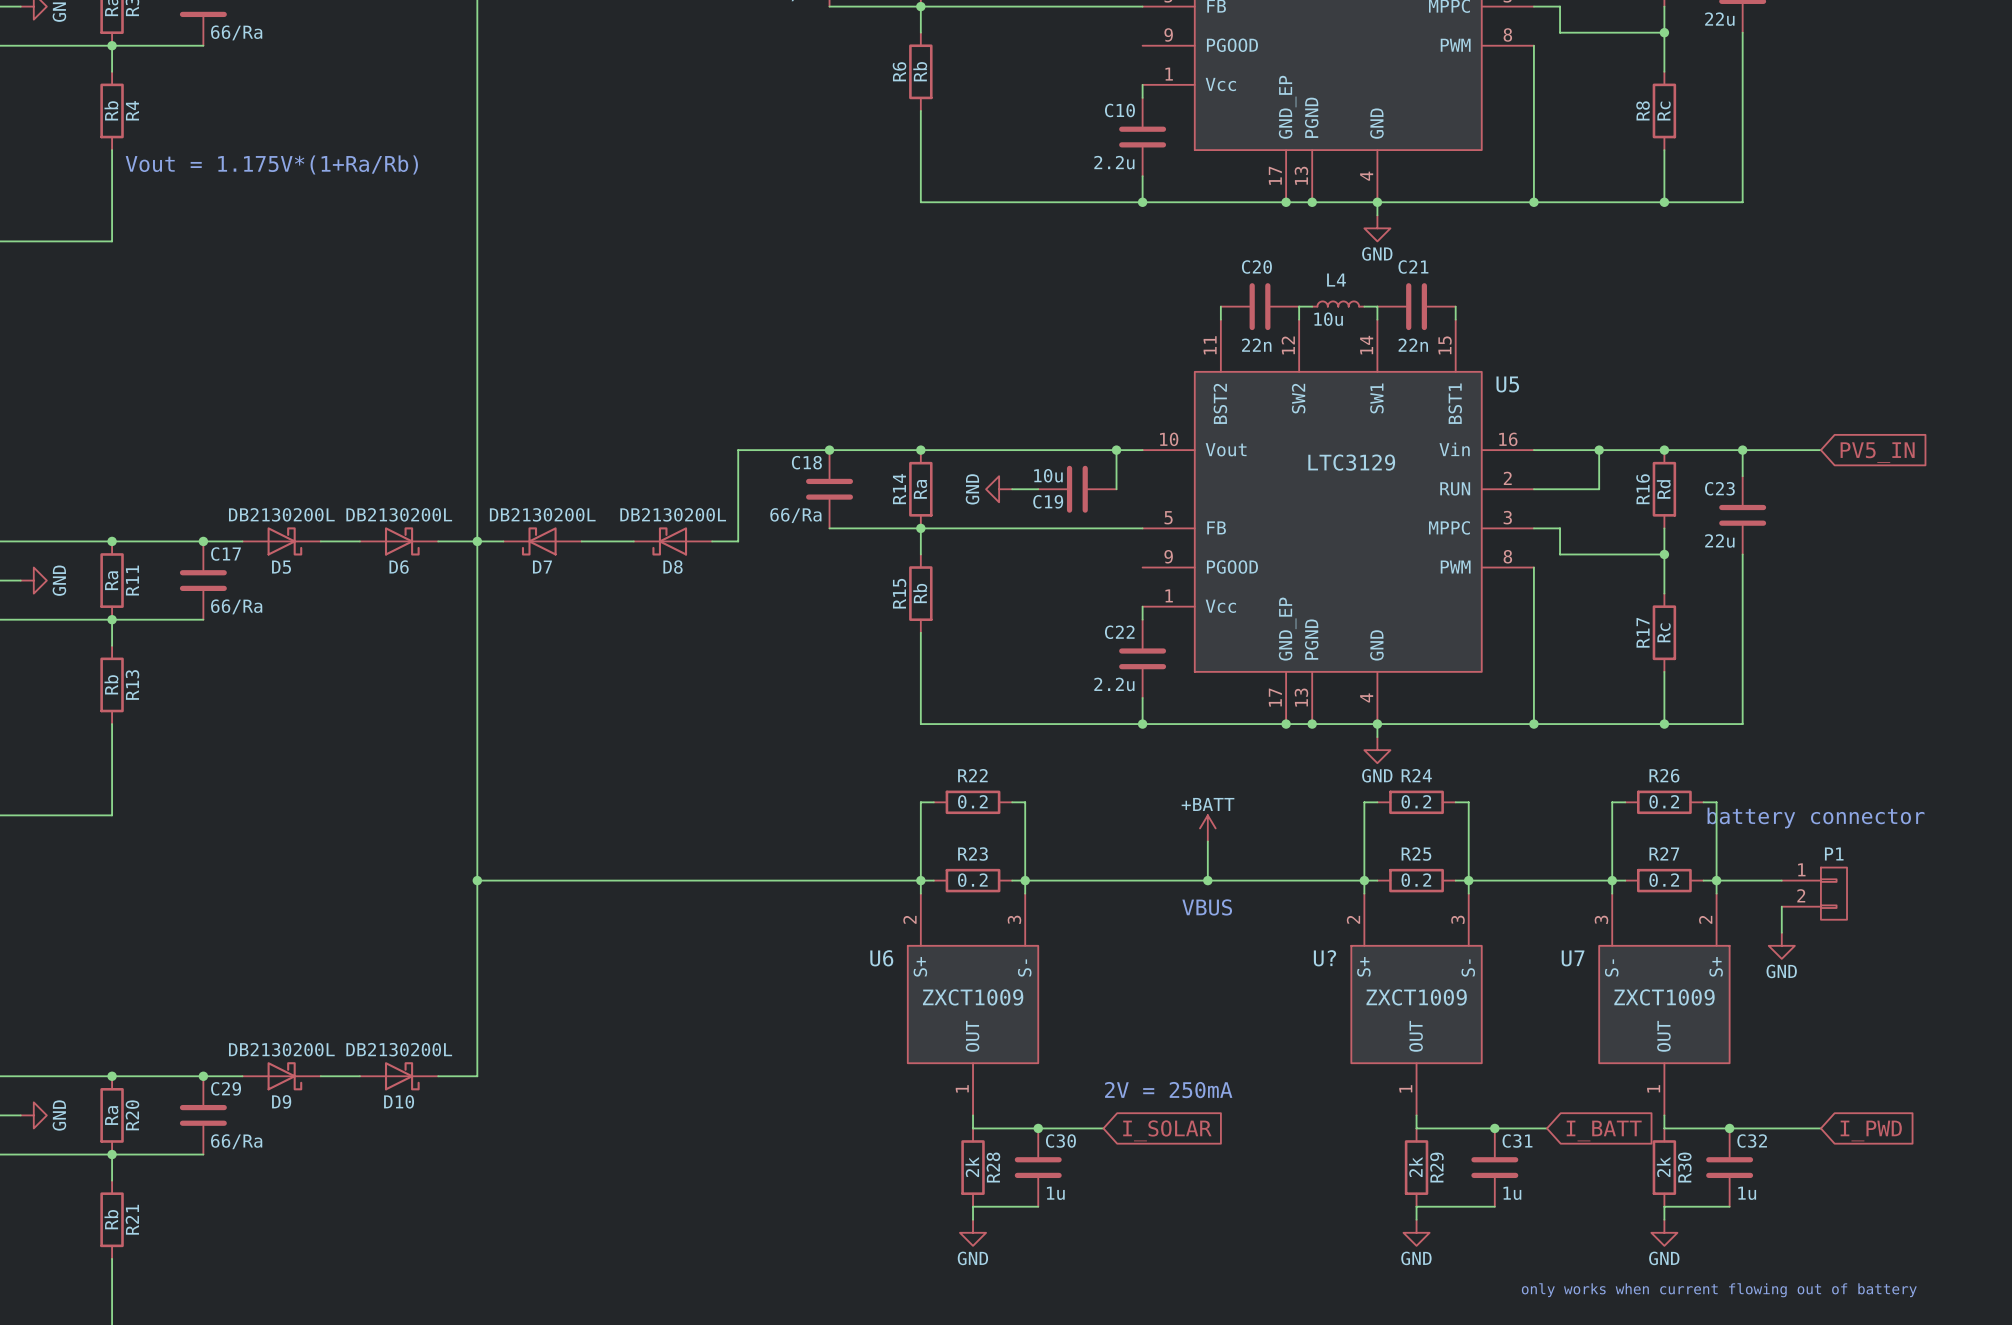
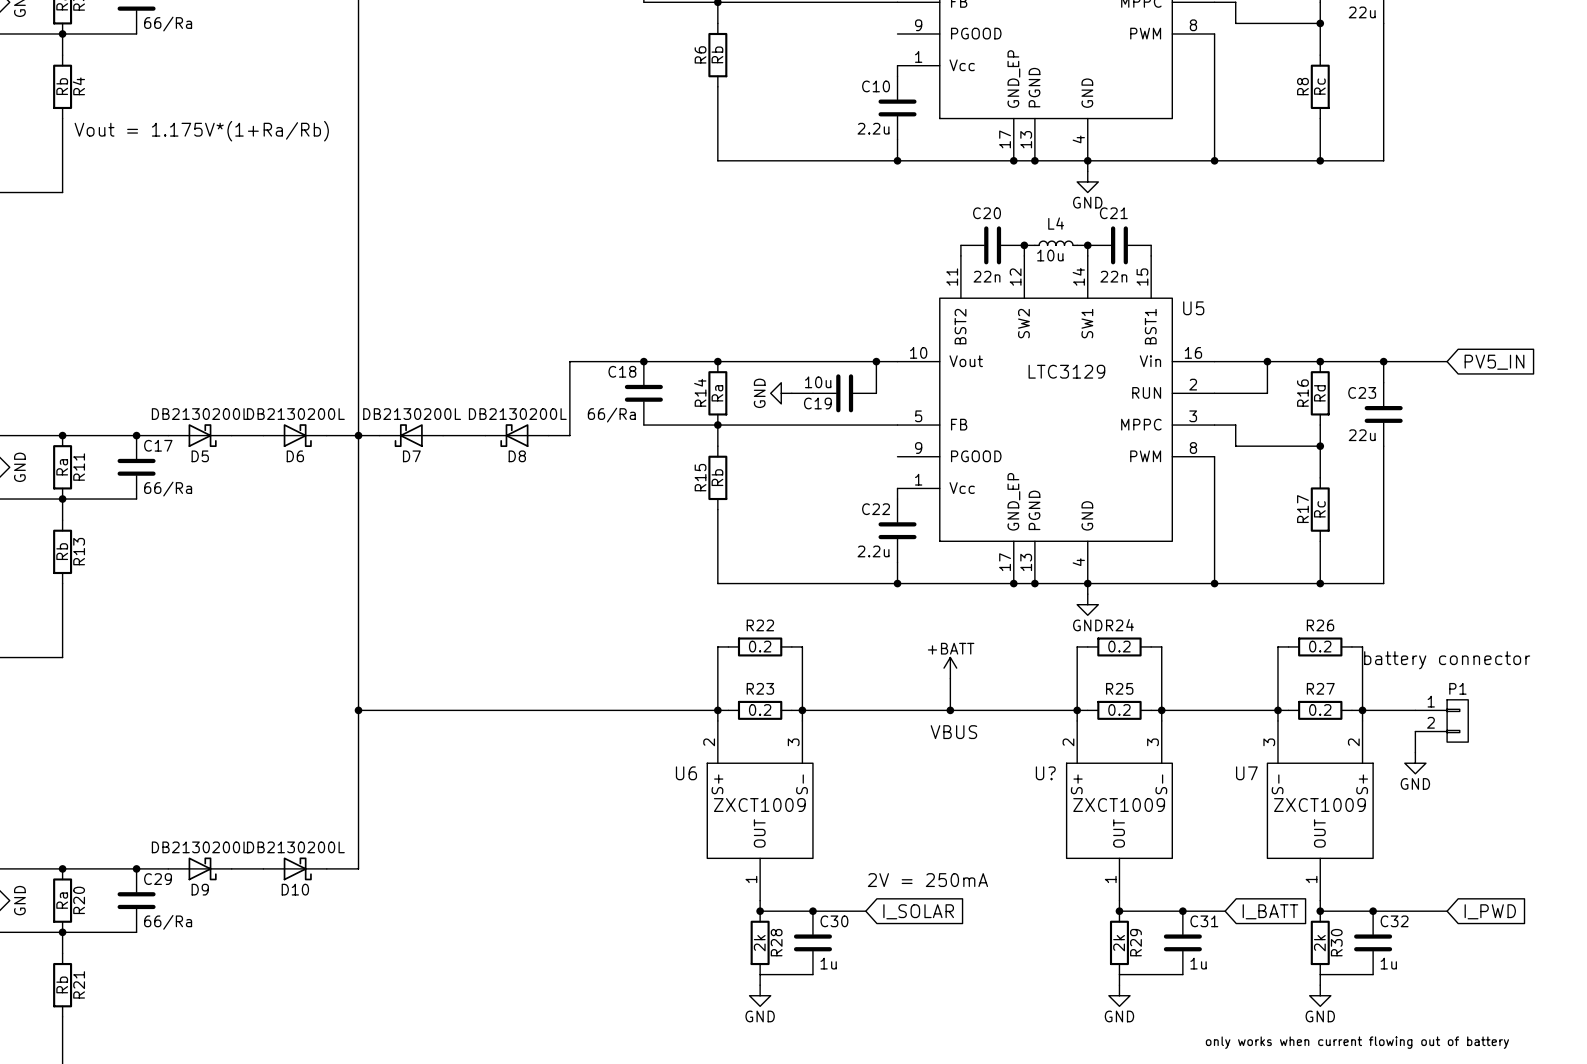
junction: none -> (1024, 245)
junction: none -> (1087, 245)
junction: none -> (760, 911)
junction: none -> (1119, 911)
junction: none -> (1320, 911)

